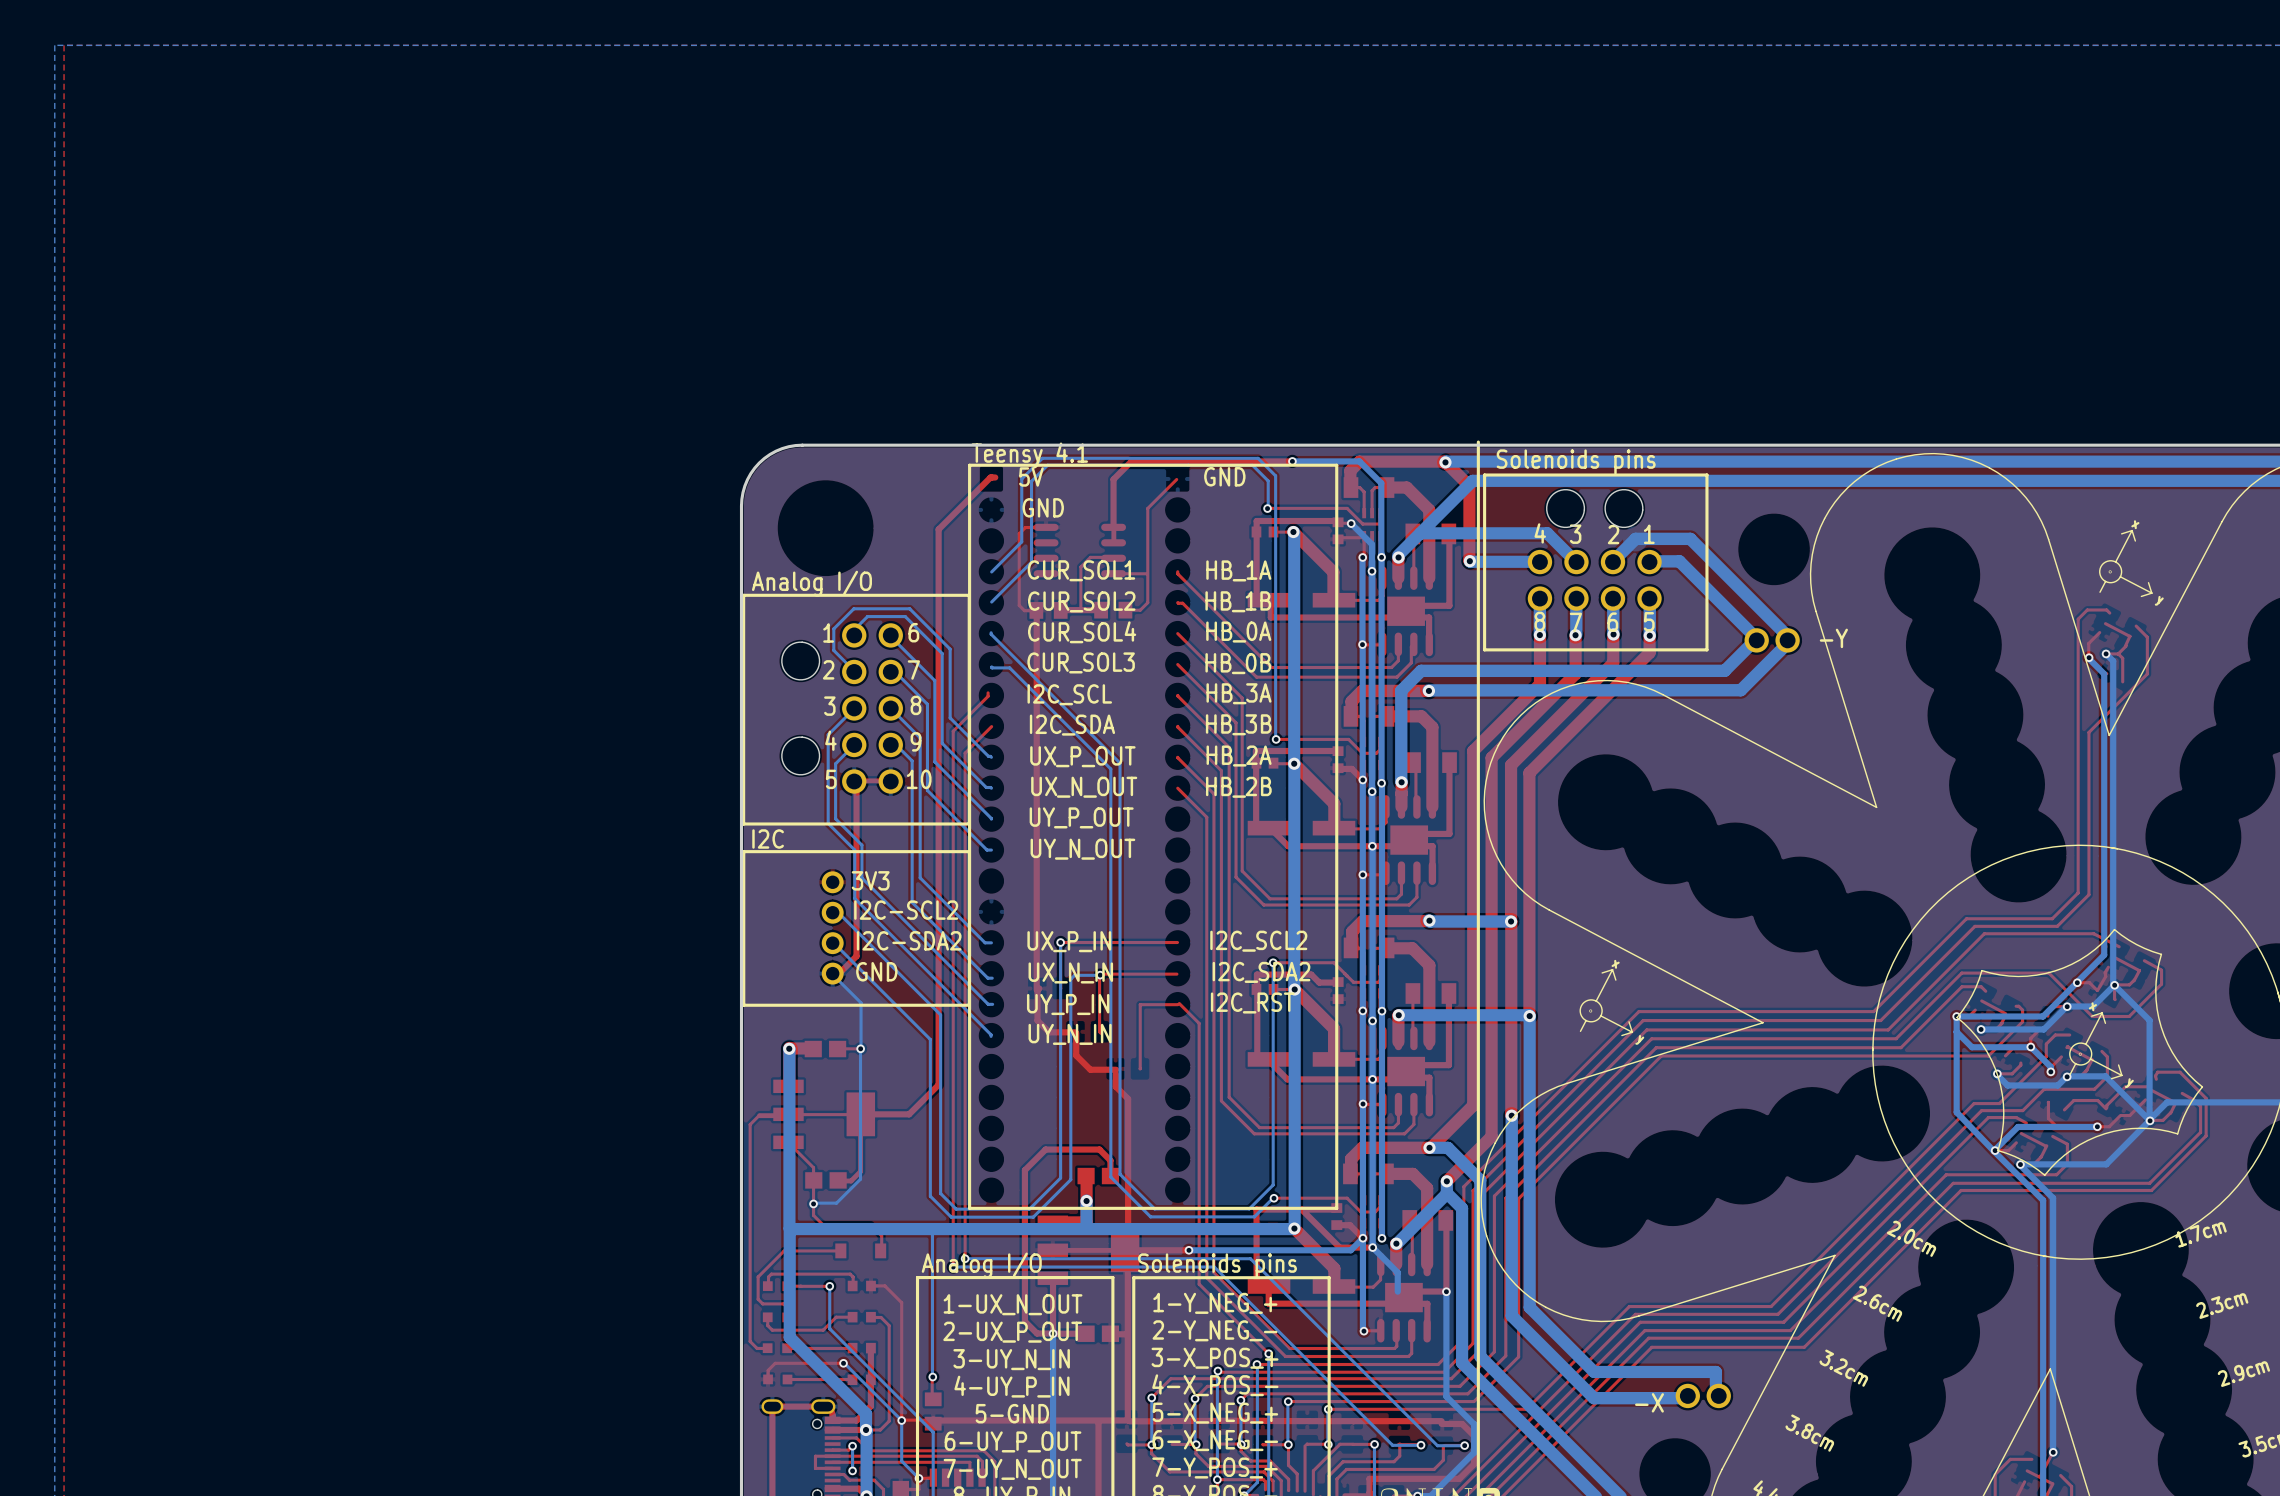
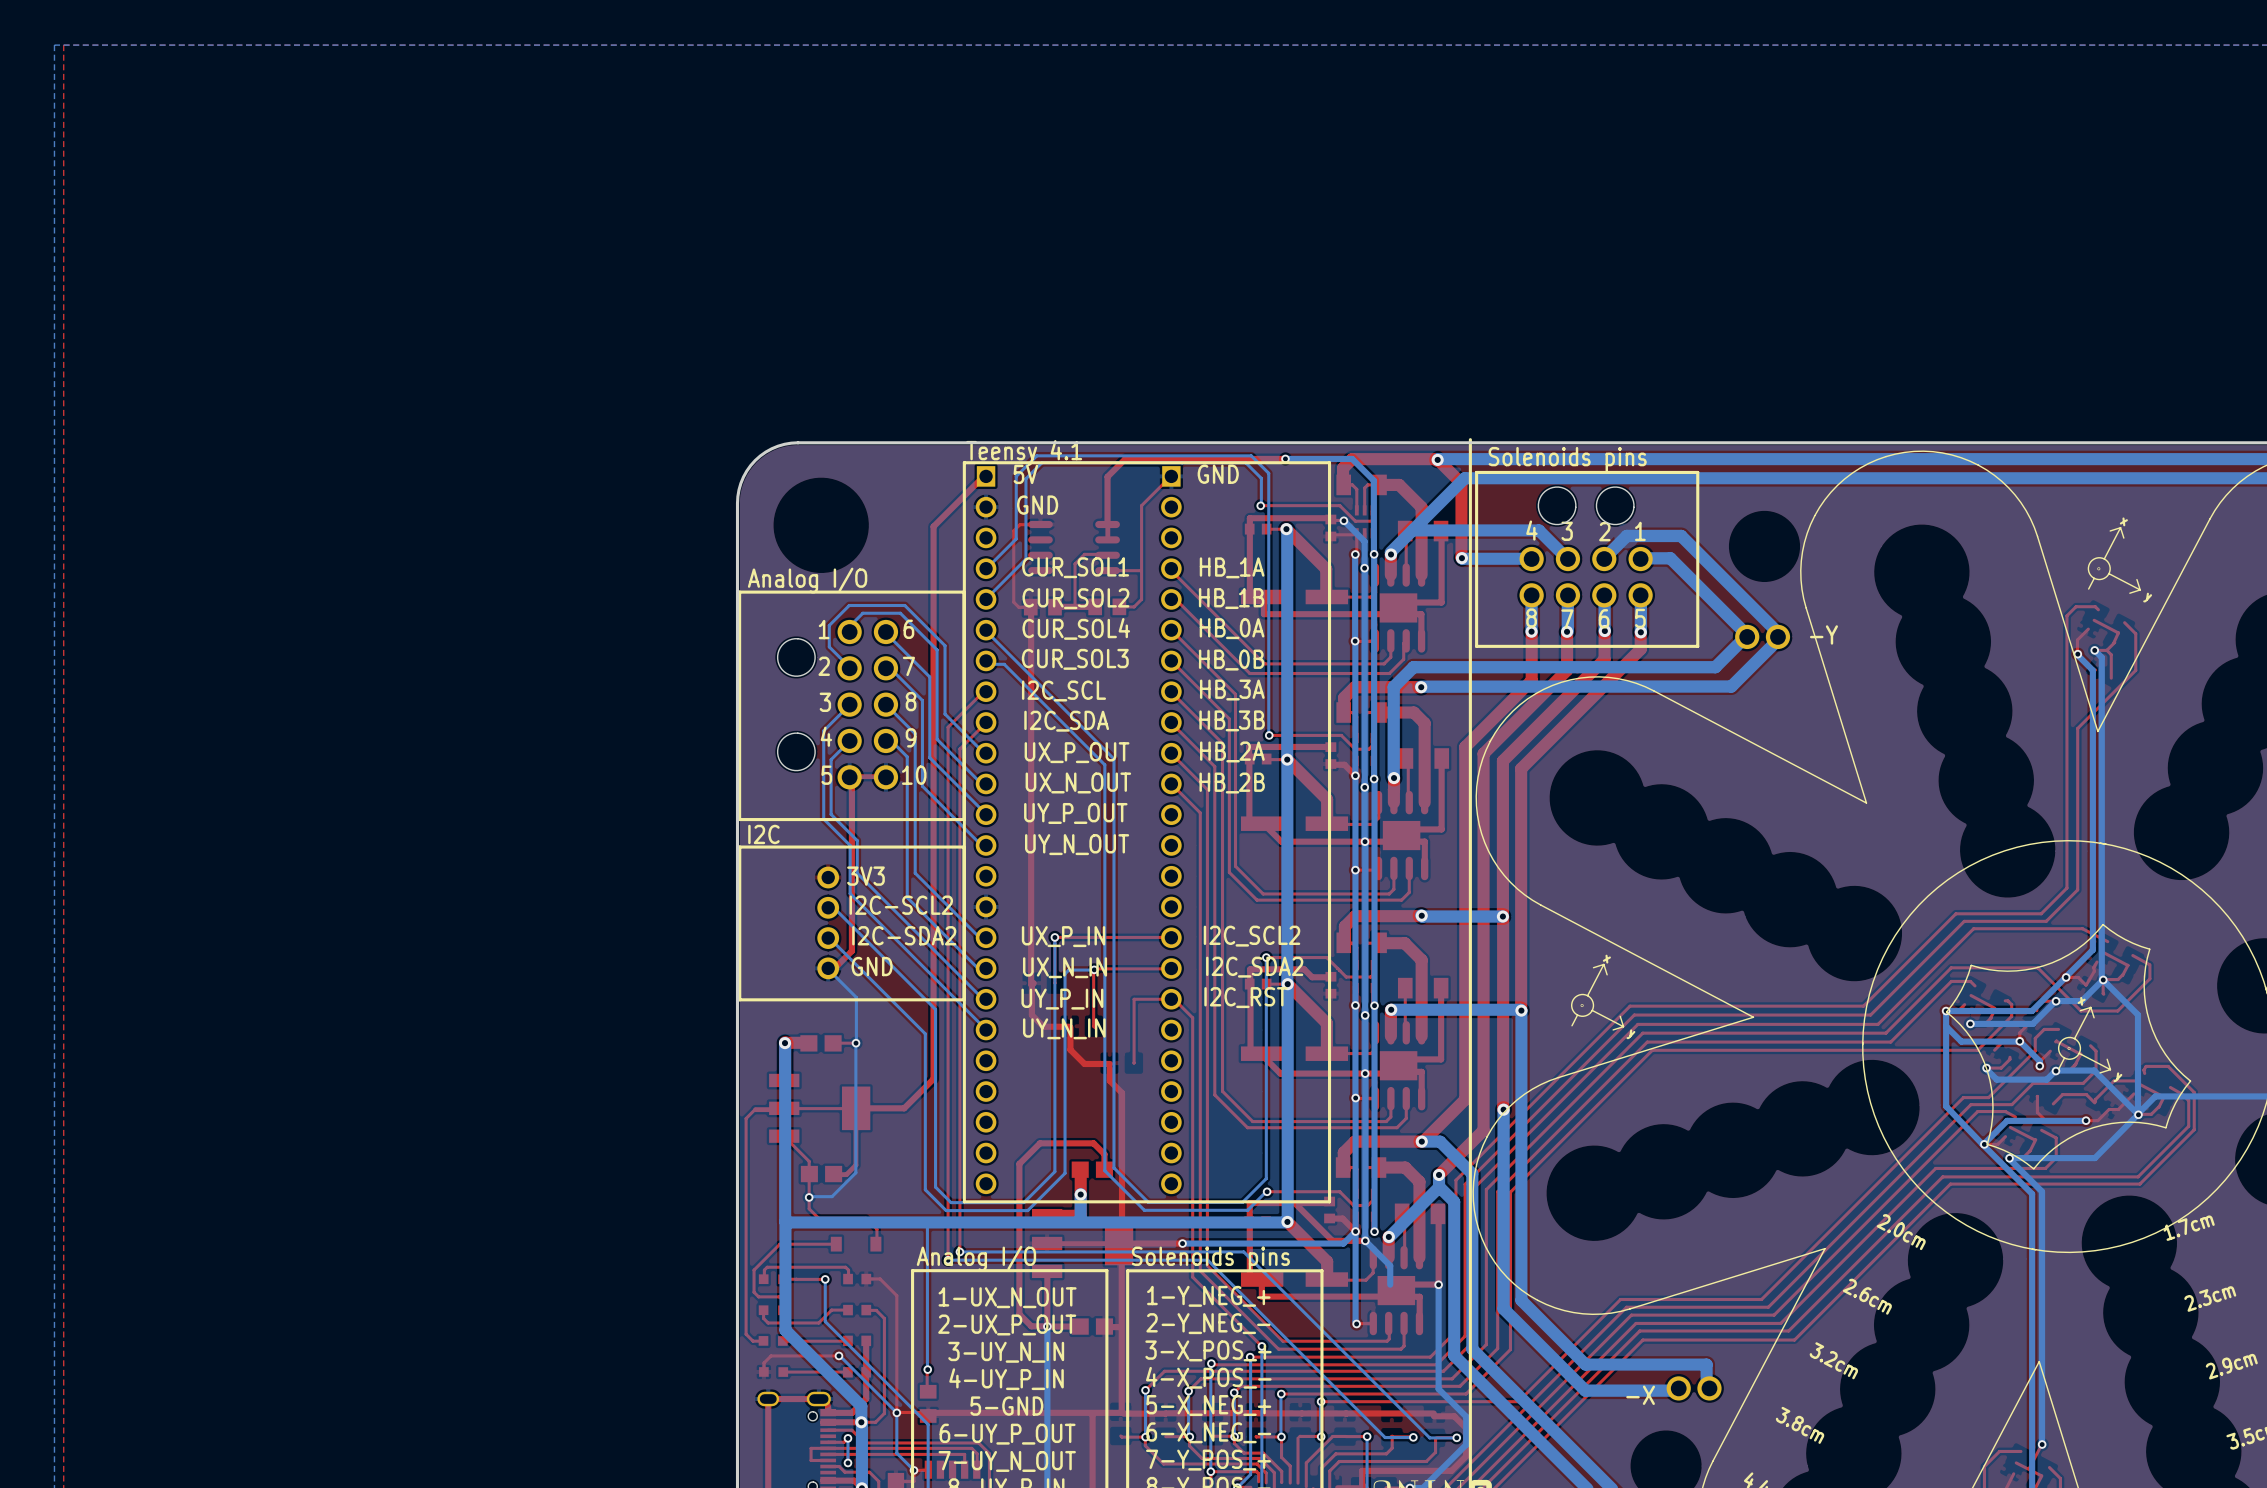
part: none -> (986, 830)
part: none -> (1171, 830)

